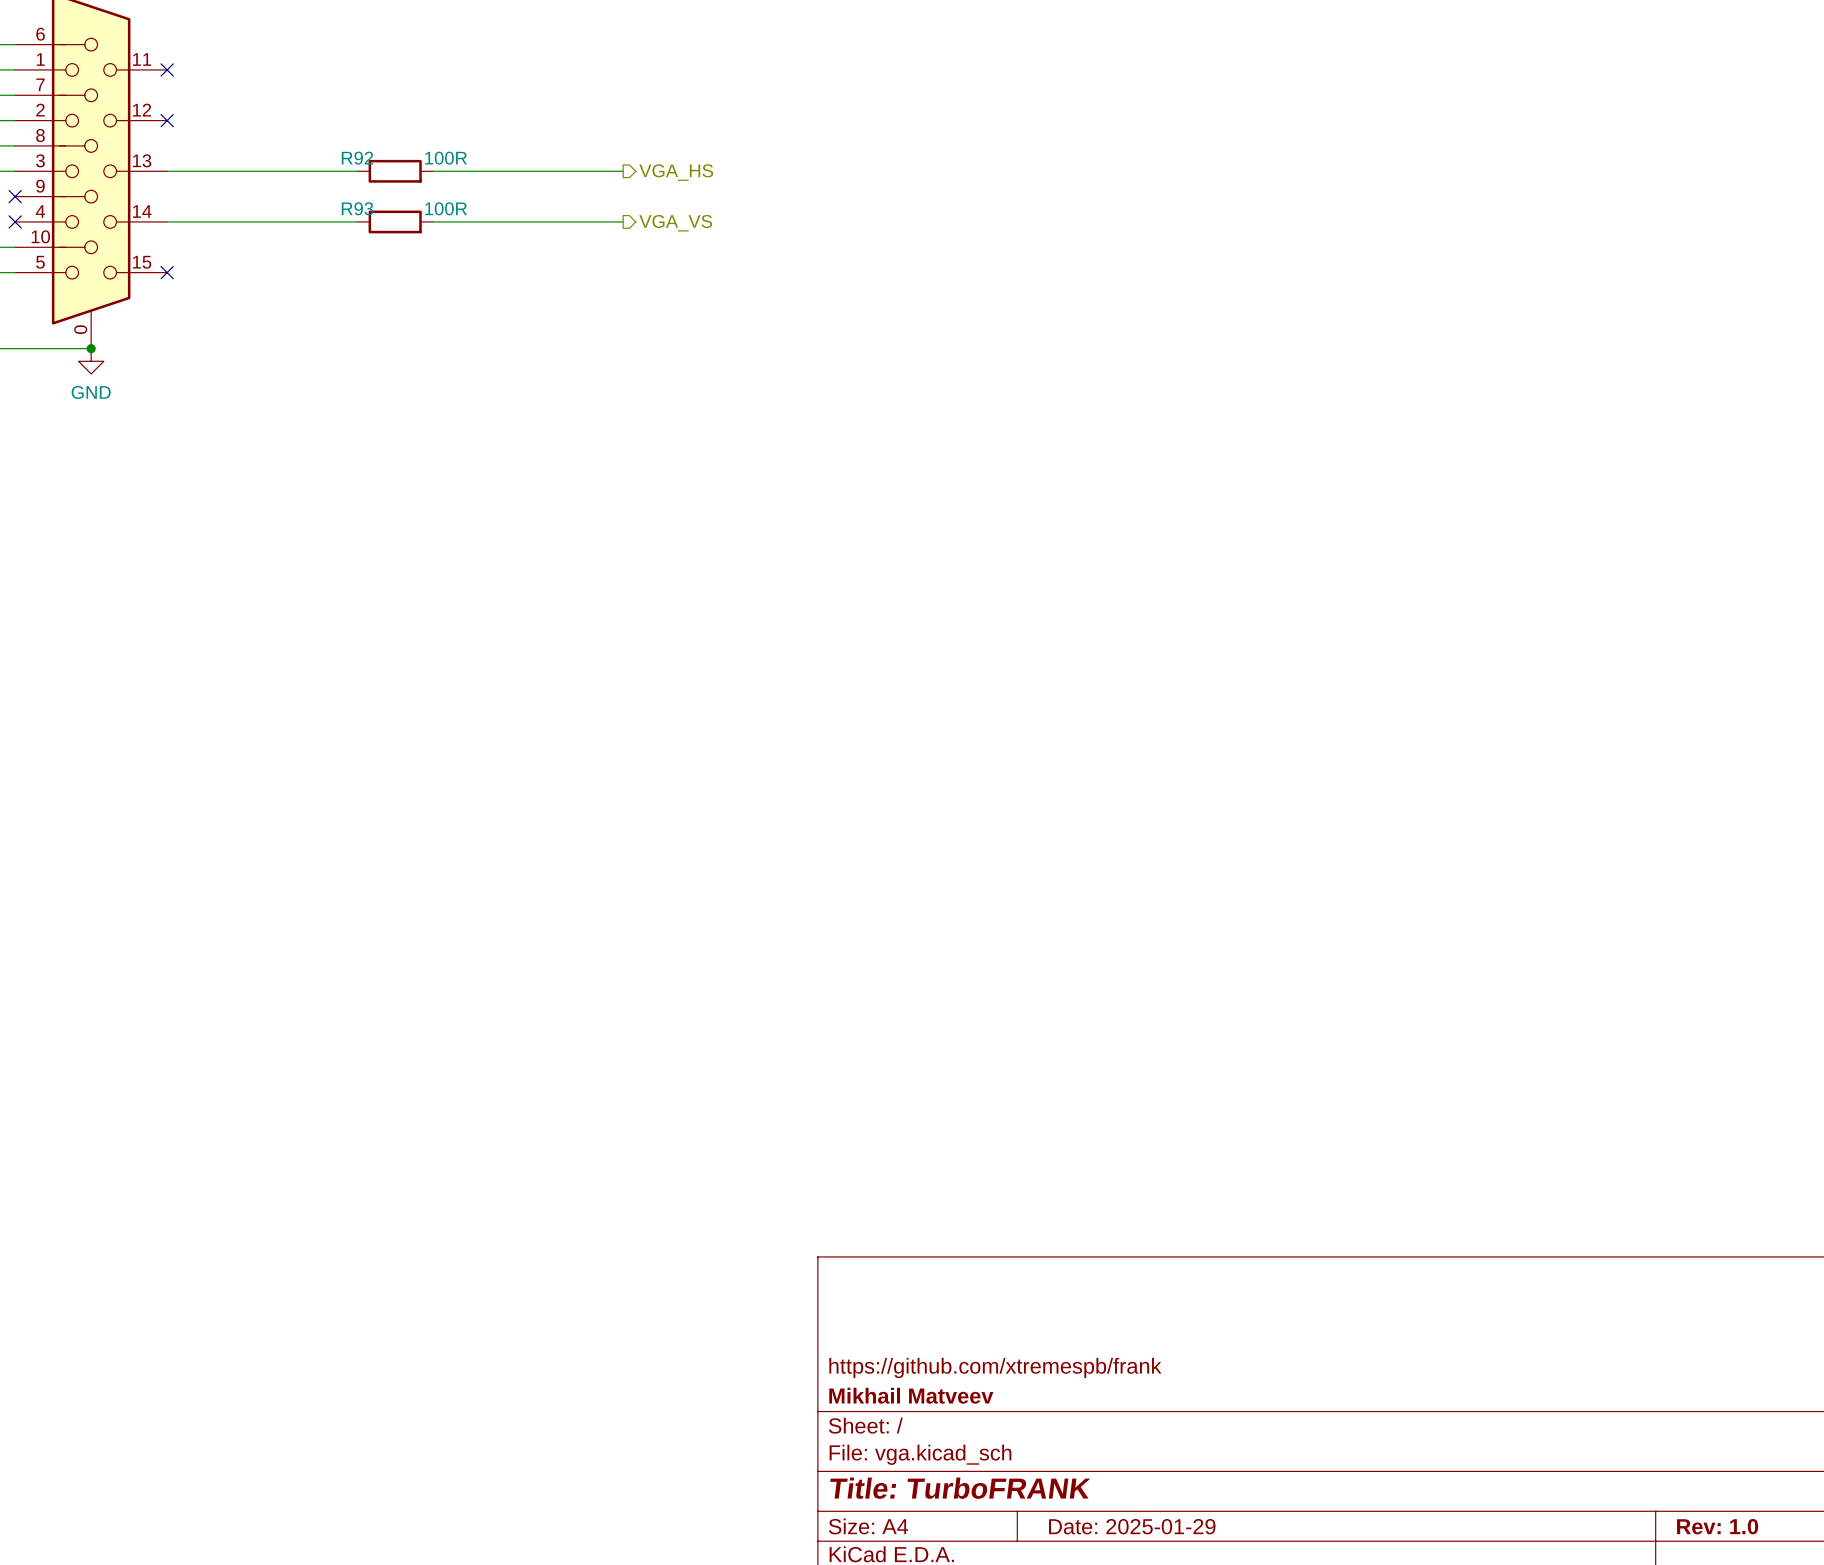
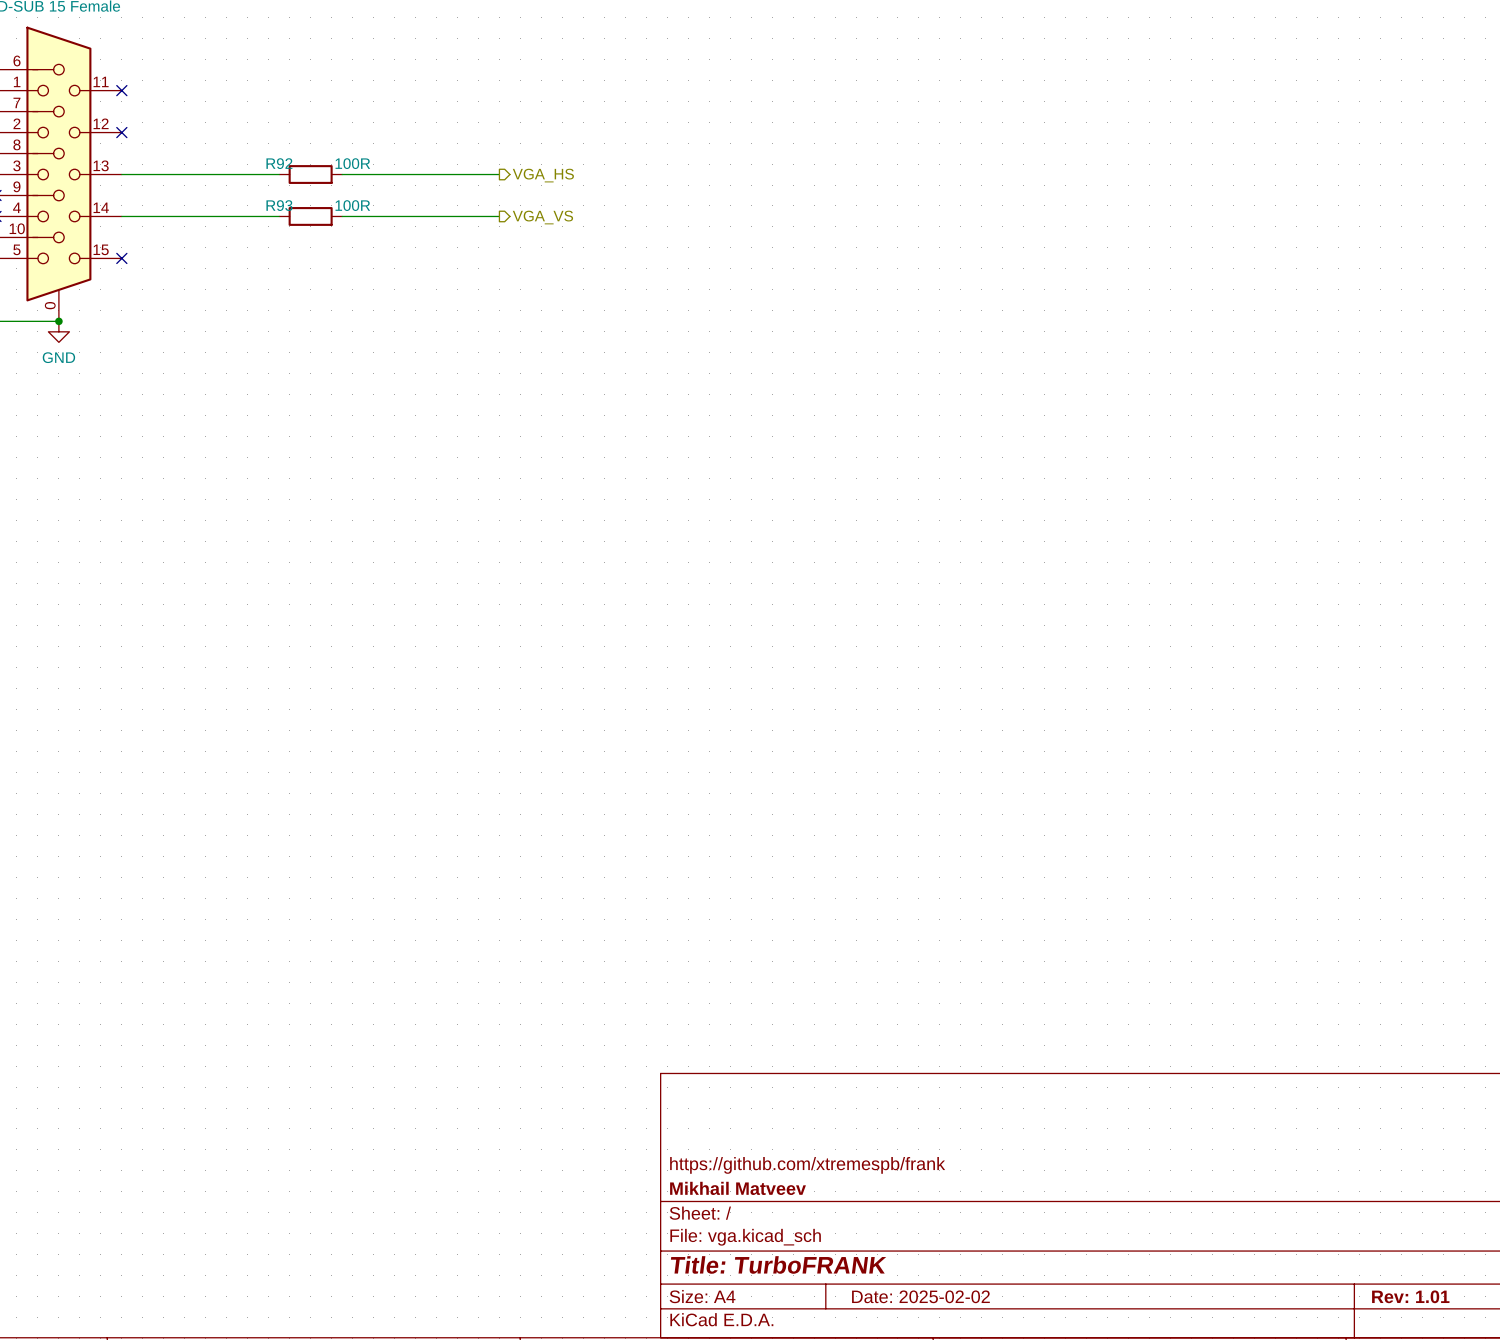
title block: Date: 2025-01-29 (1132, 1526) -> Date: 2025-02-02 (920, 1296)
title block: Rev: 1.0 (1717, 1526) -> Rev: 1.01 (1410, 1296)

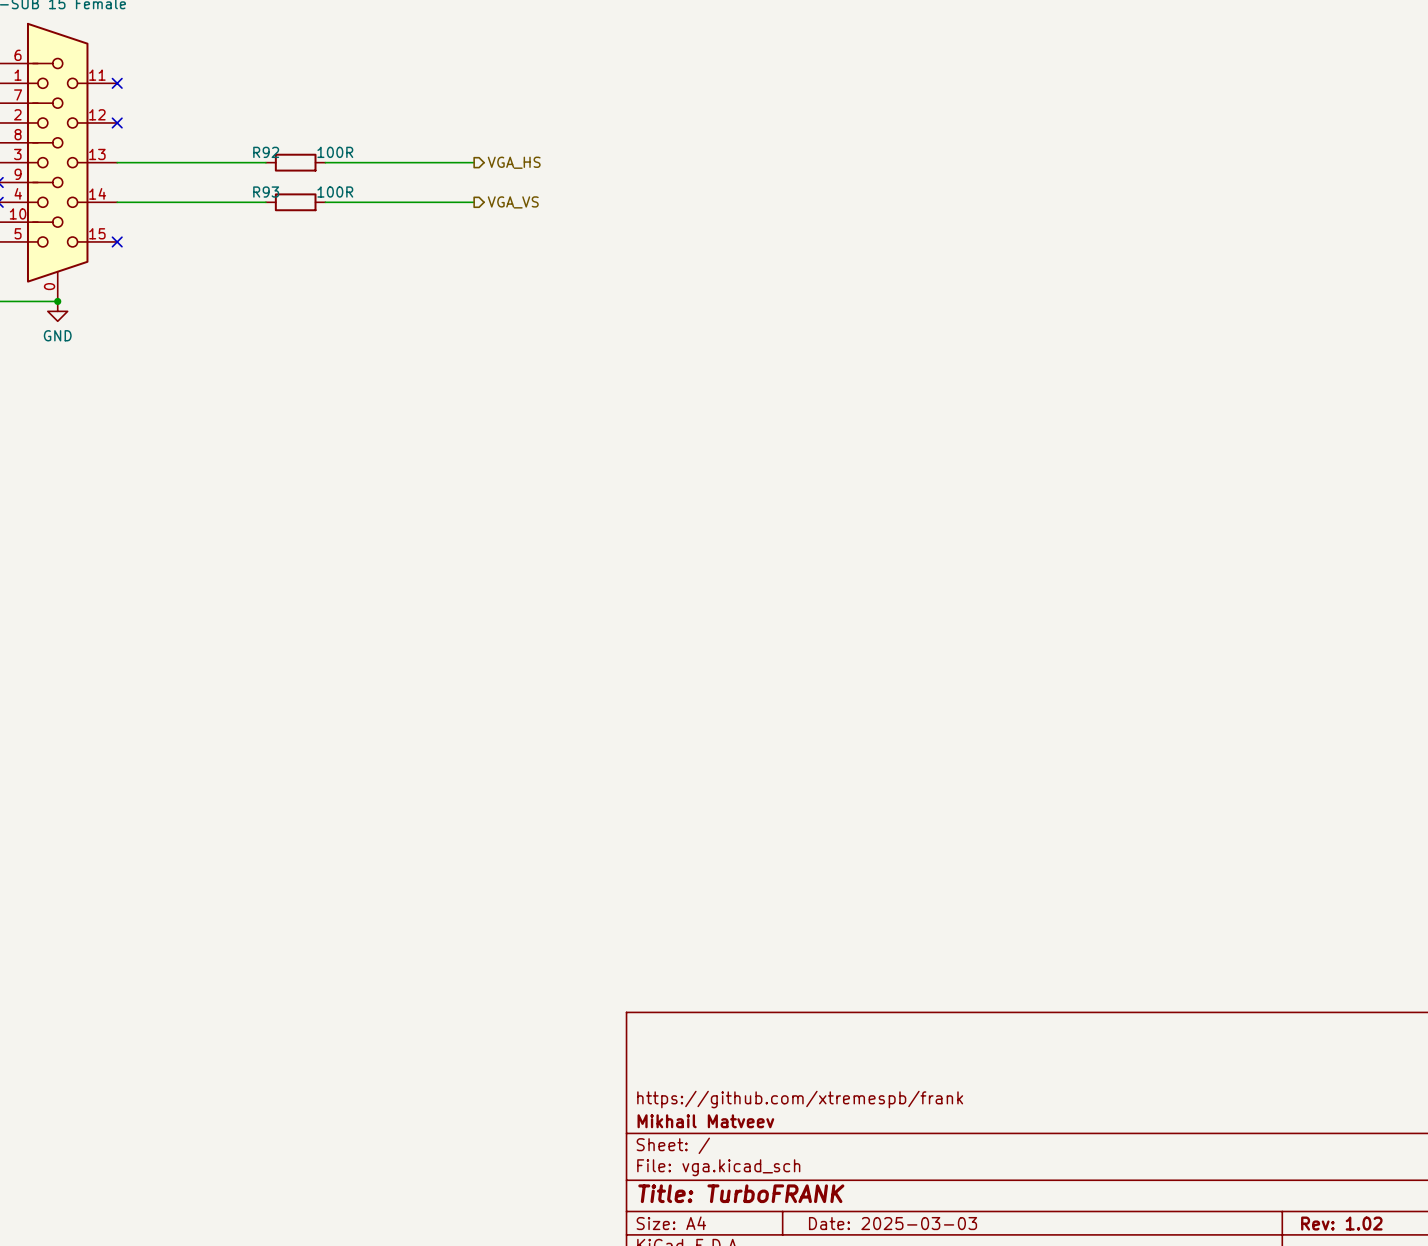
title block: Date: 2025-02-02 (920, 1296) -> Date: 2025-03-03 (893, 1223)
title block: Rev: 1.01 (1410, 1296) -> Rev: 1.02 (1341, 1223)

